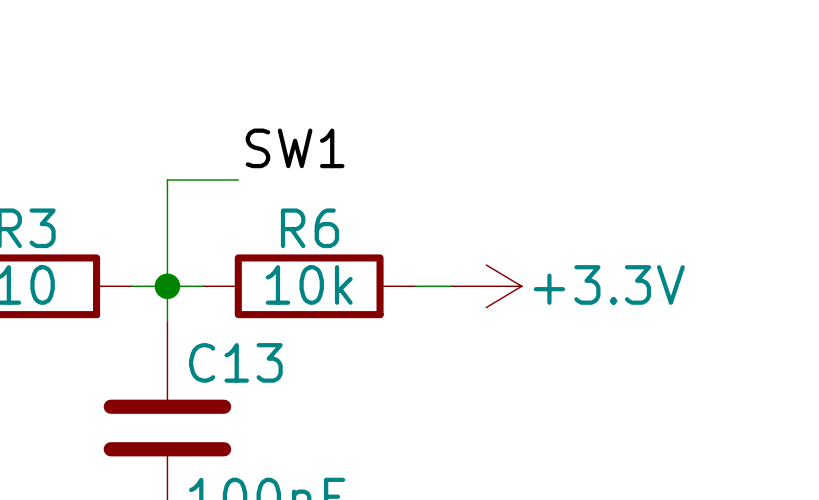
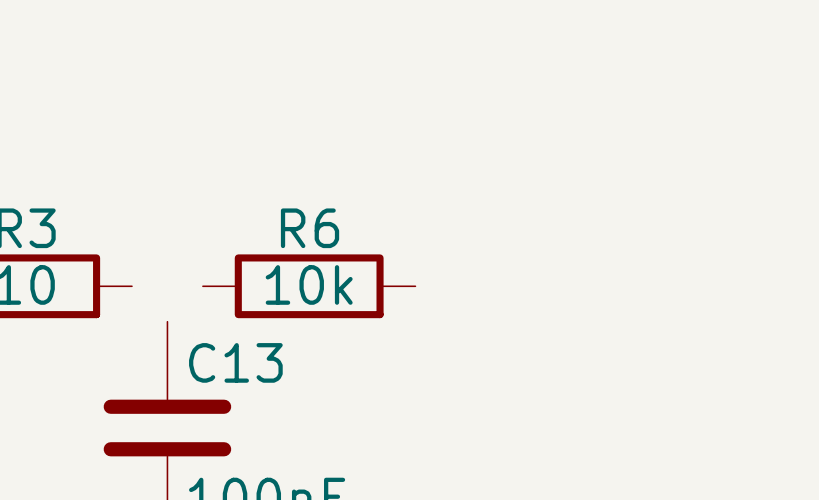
label: SW1 (295, 148) -> none
wire: (238, 179) (167, 179) (167, 321) -> none
wire: (132, 286) (202, 286) -> none
junction: (167, 286) -> none
wire: (415, 286) (450, 286) -> none
power symbol: +3.3V (486, 286) -> none

